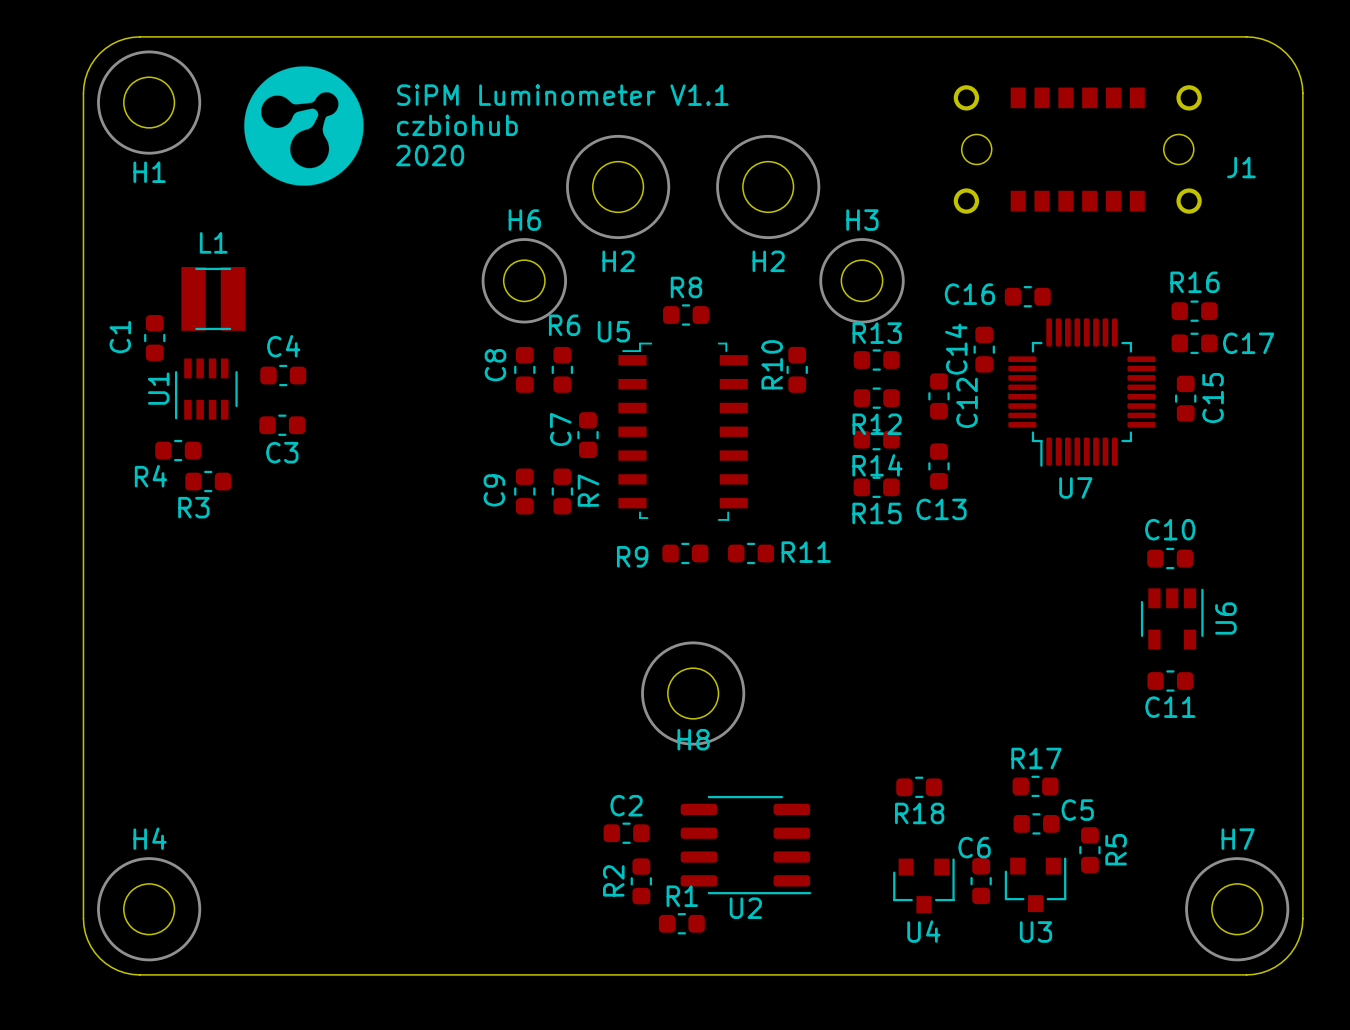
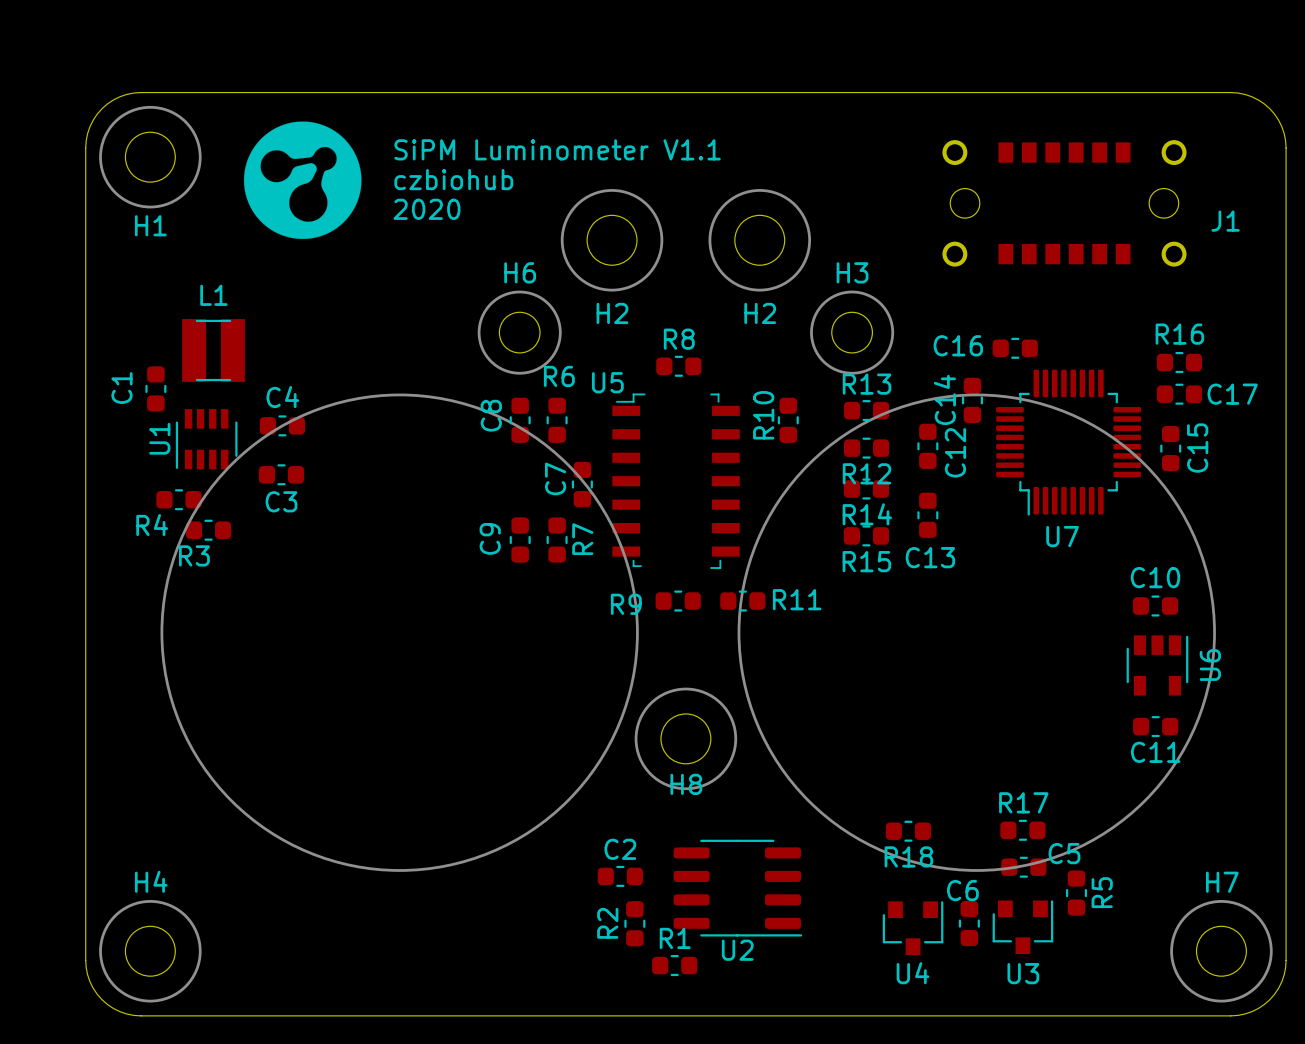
drawing: none -> [160, 393, 639, 872]
drawing: none -> [737, 393, 1216, 872]

